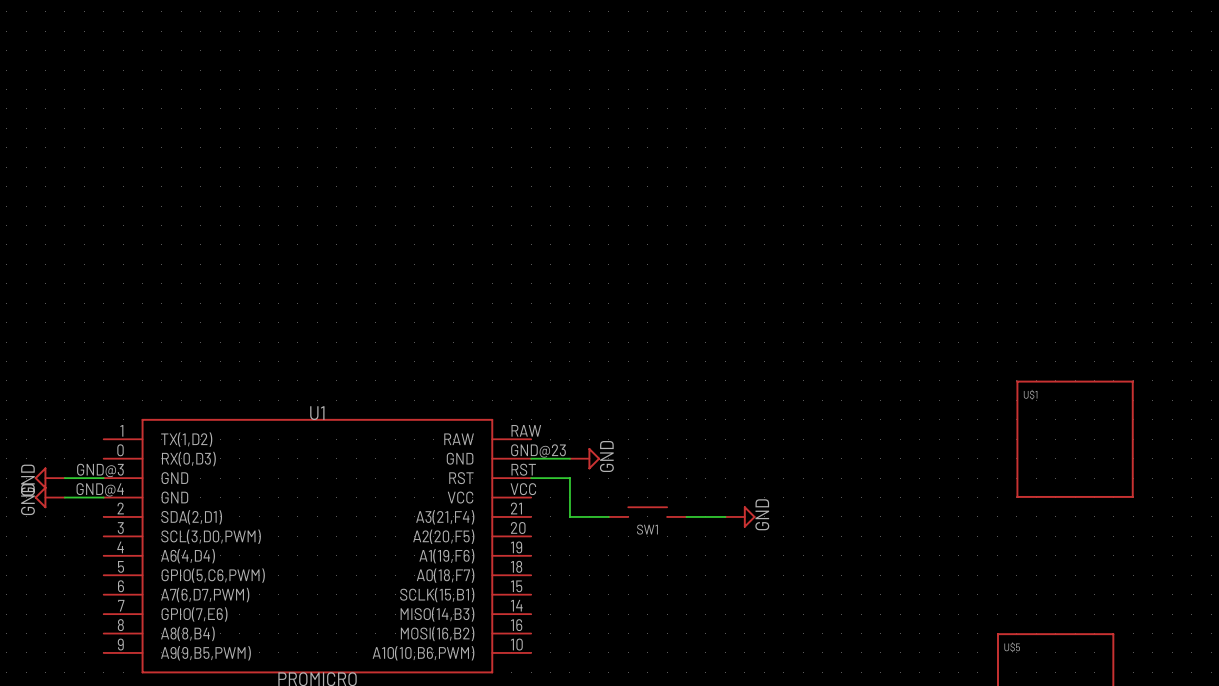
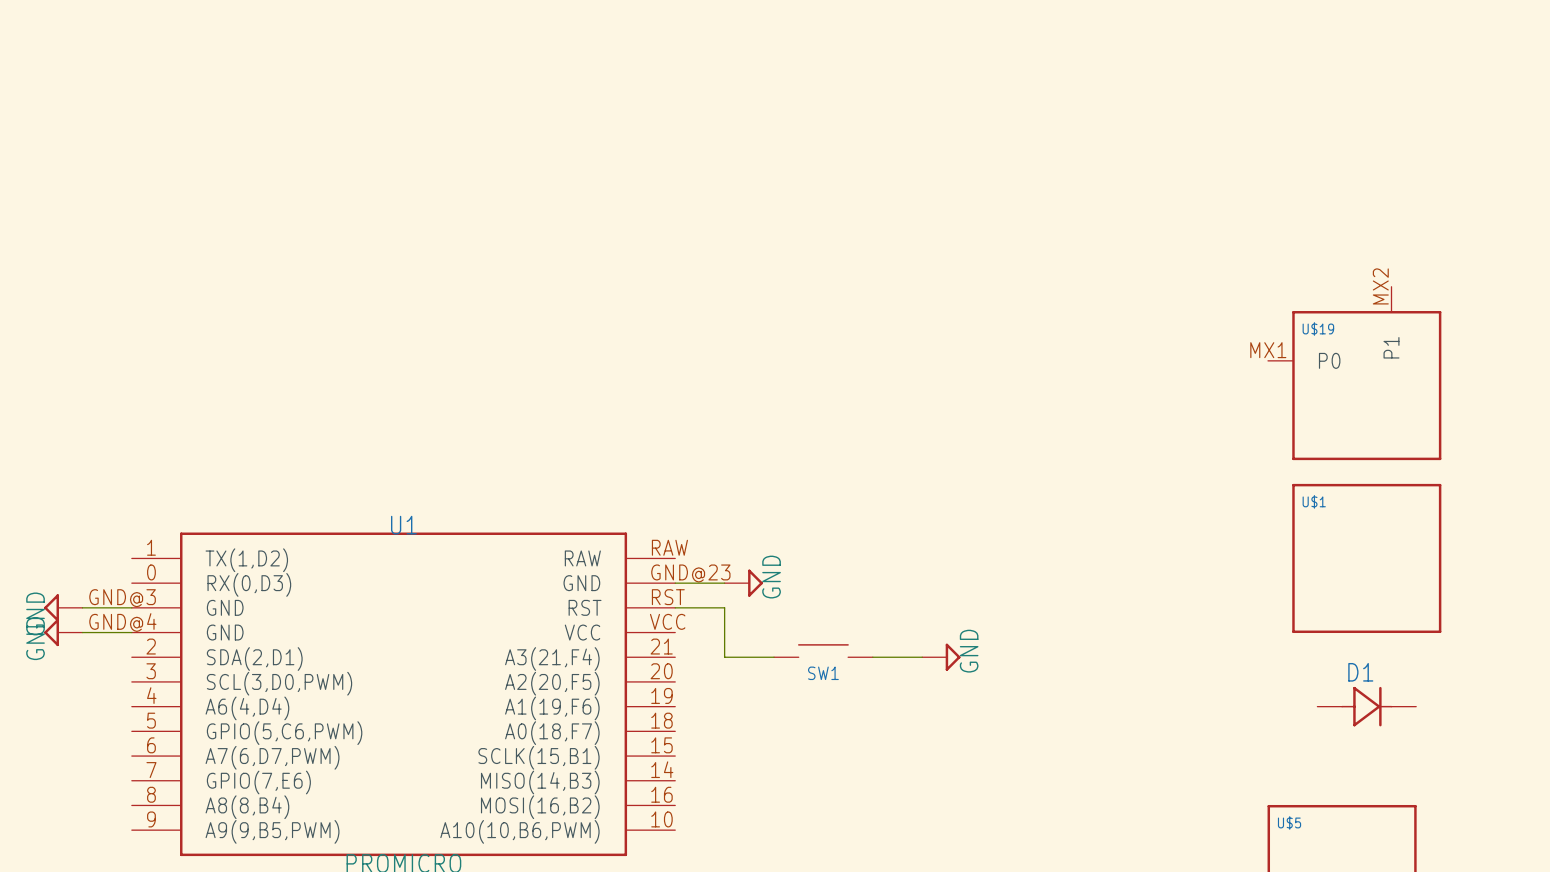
U$19: none -> (1354, 373)
D1: none -> (1366, 706)

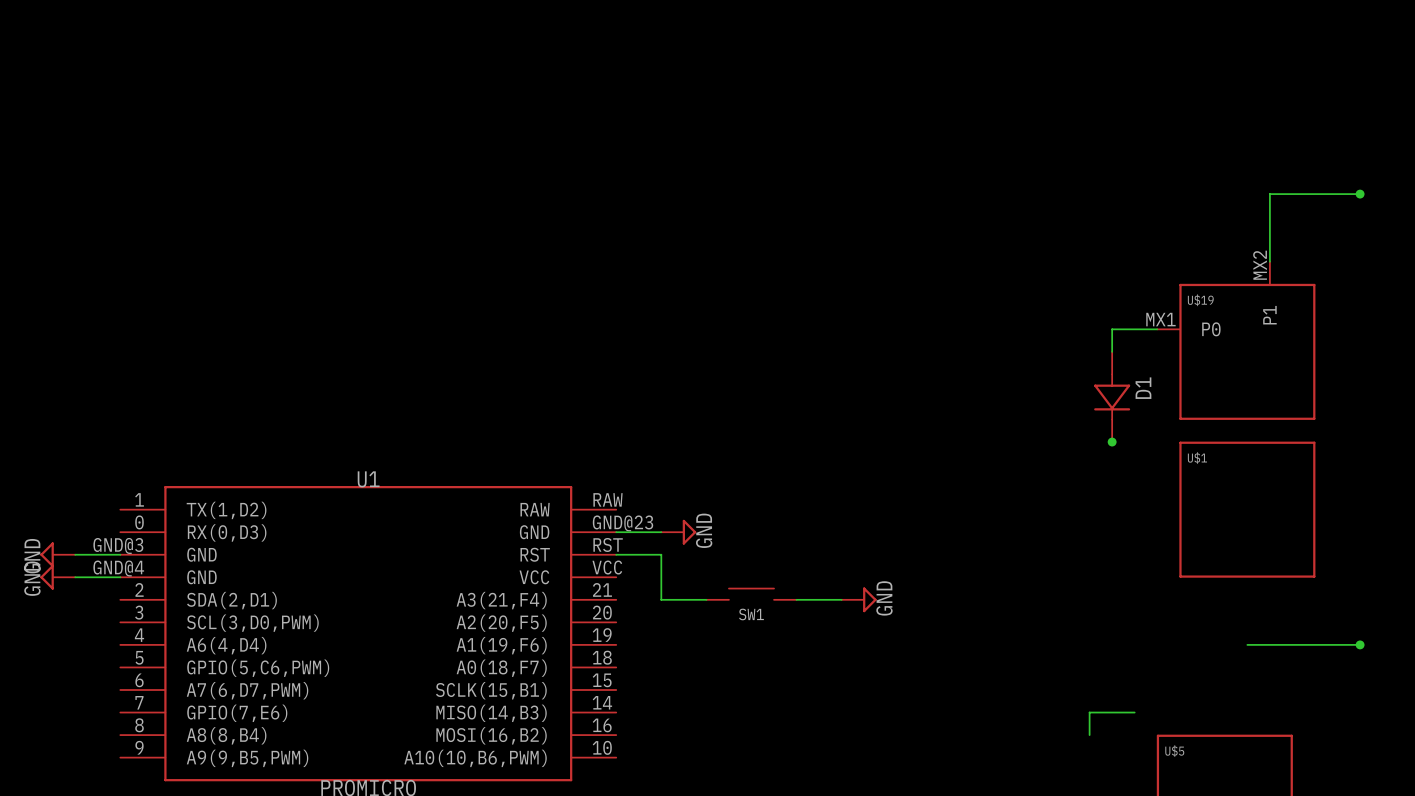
wire: none -> (1360, 194) (1269, 194) (1269, 261)
junction: none -> (1360, 194)
wire: none -> (1157, 329) (1112, 329) (1112, 351)
junction: none -> (1112, 442)
wire: none -> (1247, 644) (1360, 644)
D1 rotation: 0° (1366, 706) -> 90° clockwise (1112, 396)
D1 position: (1366, 706) -> (1112, 396)
junction: none -> (1360, 644)
wire: none -> (1134, 712) (1089, 712) (1089, 735)

